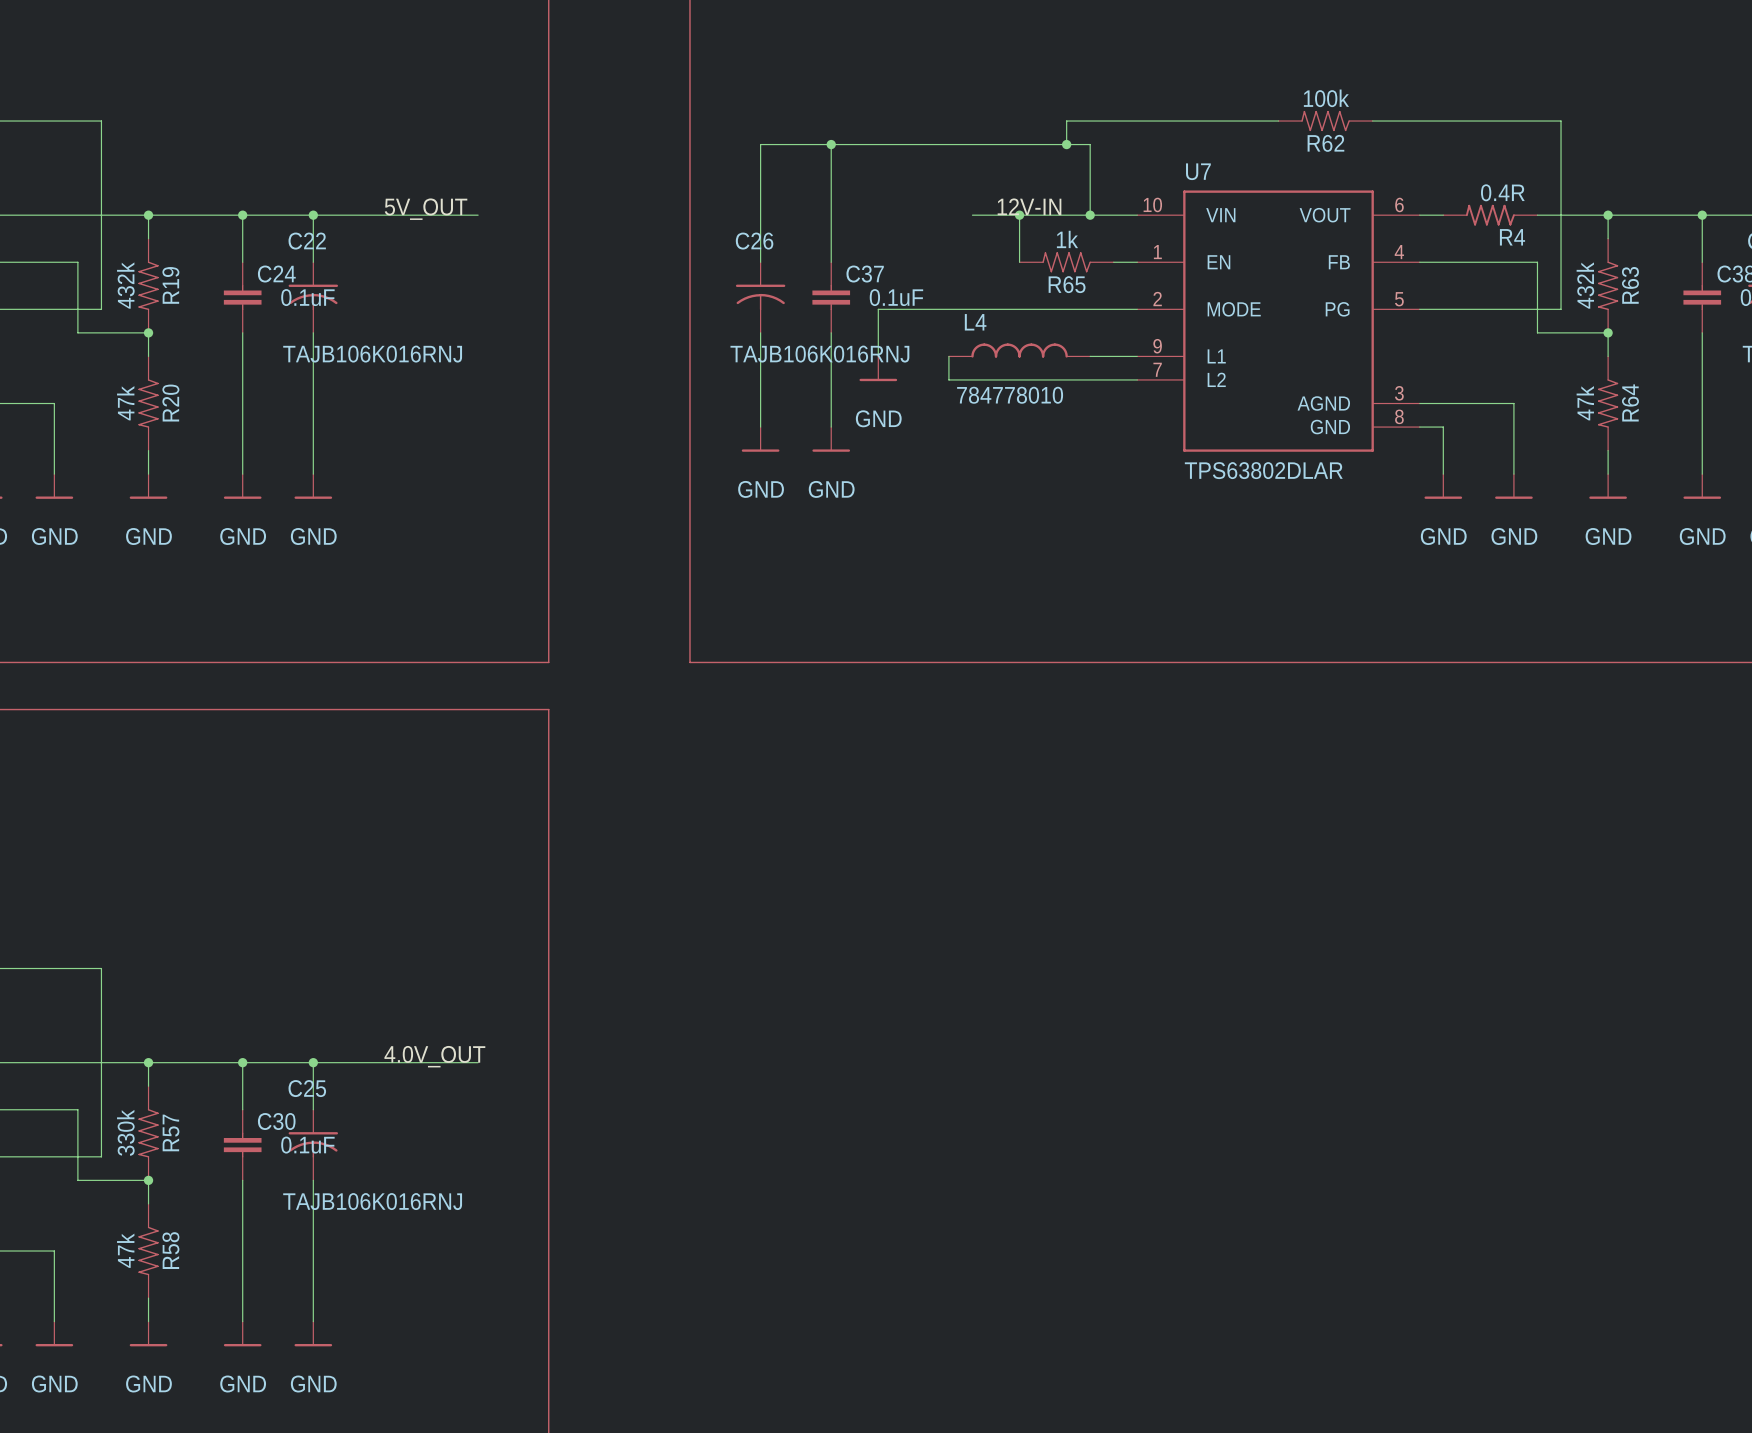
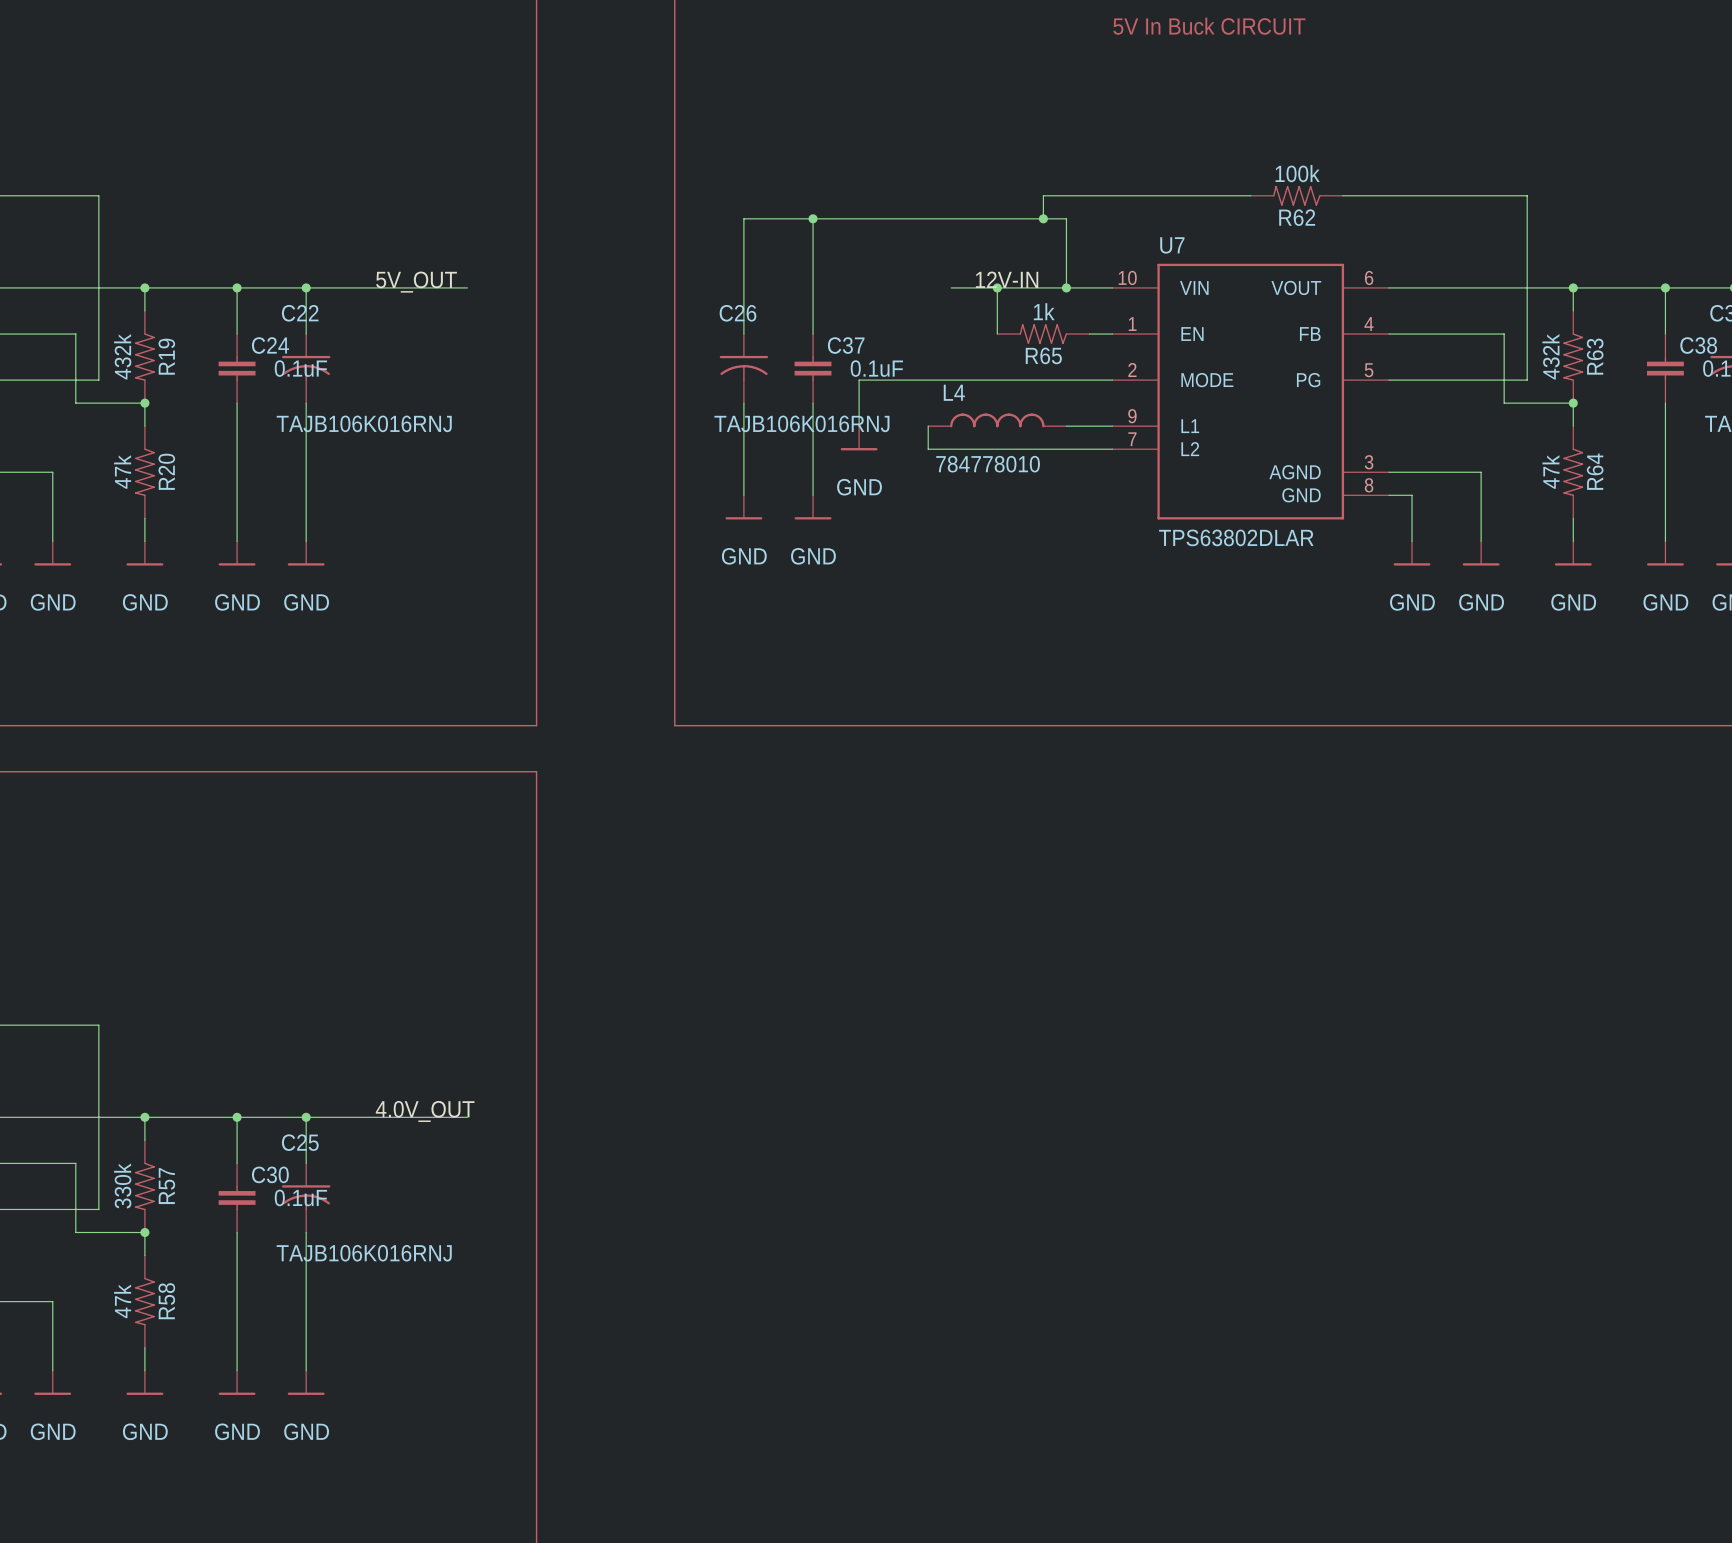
R4: 0.4R (1490, 215) -> none

